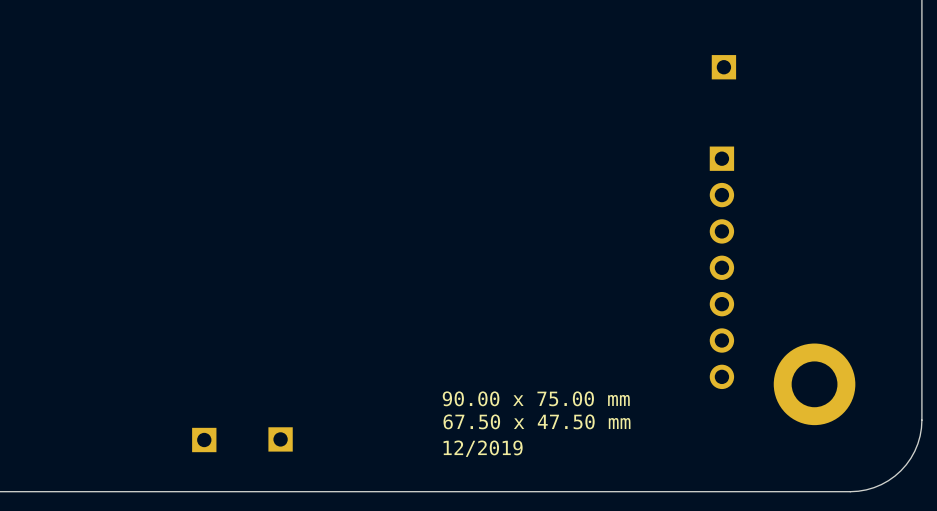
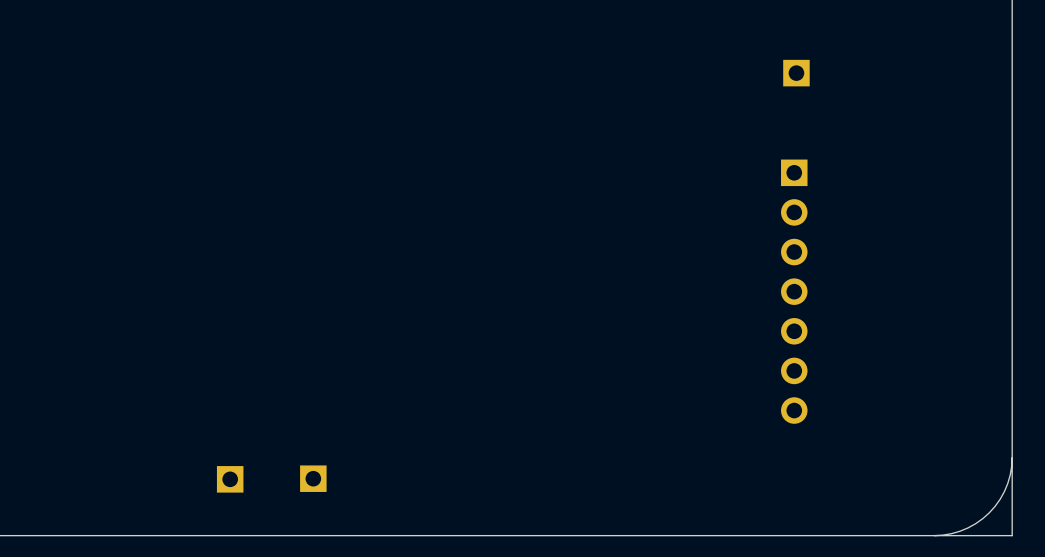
part: (814, 384) -> none
text: 90.00 x 75.00 mm (536, 398) -> none
board edge: none -> (1012, 457) (1012, 535) (934, 535)
text: 67.50 x 47.50 mm (536, 421) -> none
text: 12/2019 (483, 448) -> none

